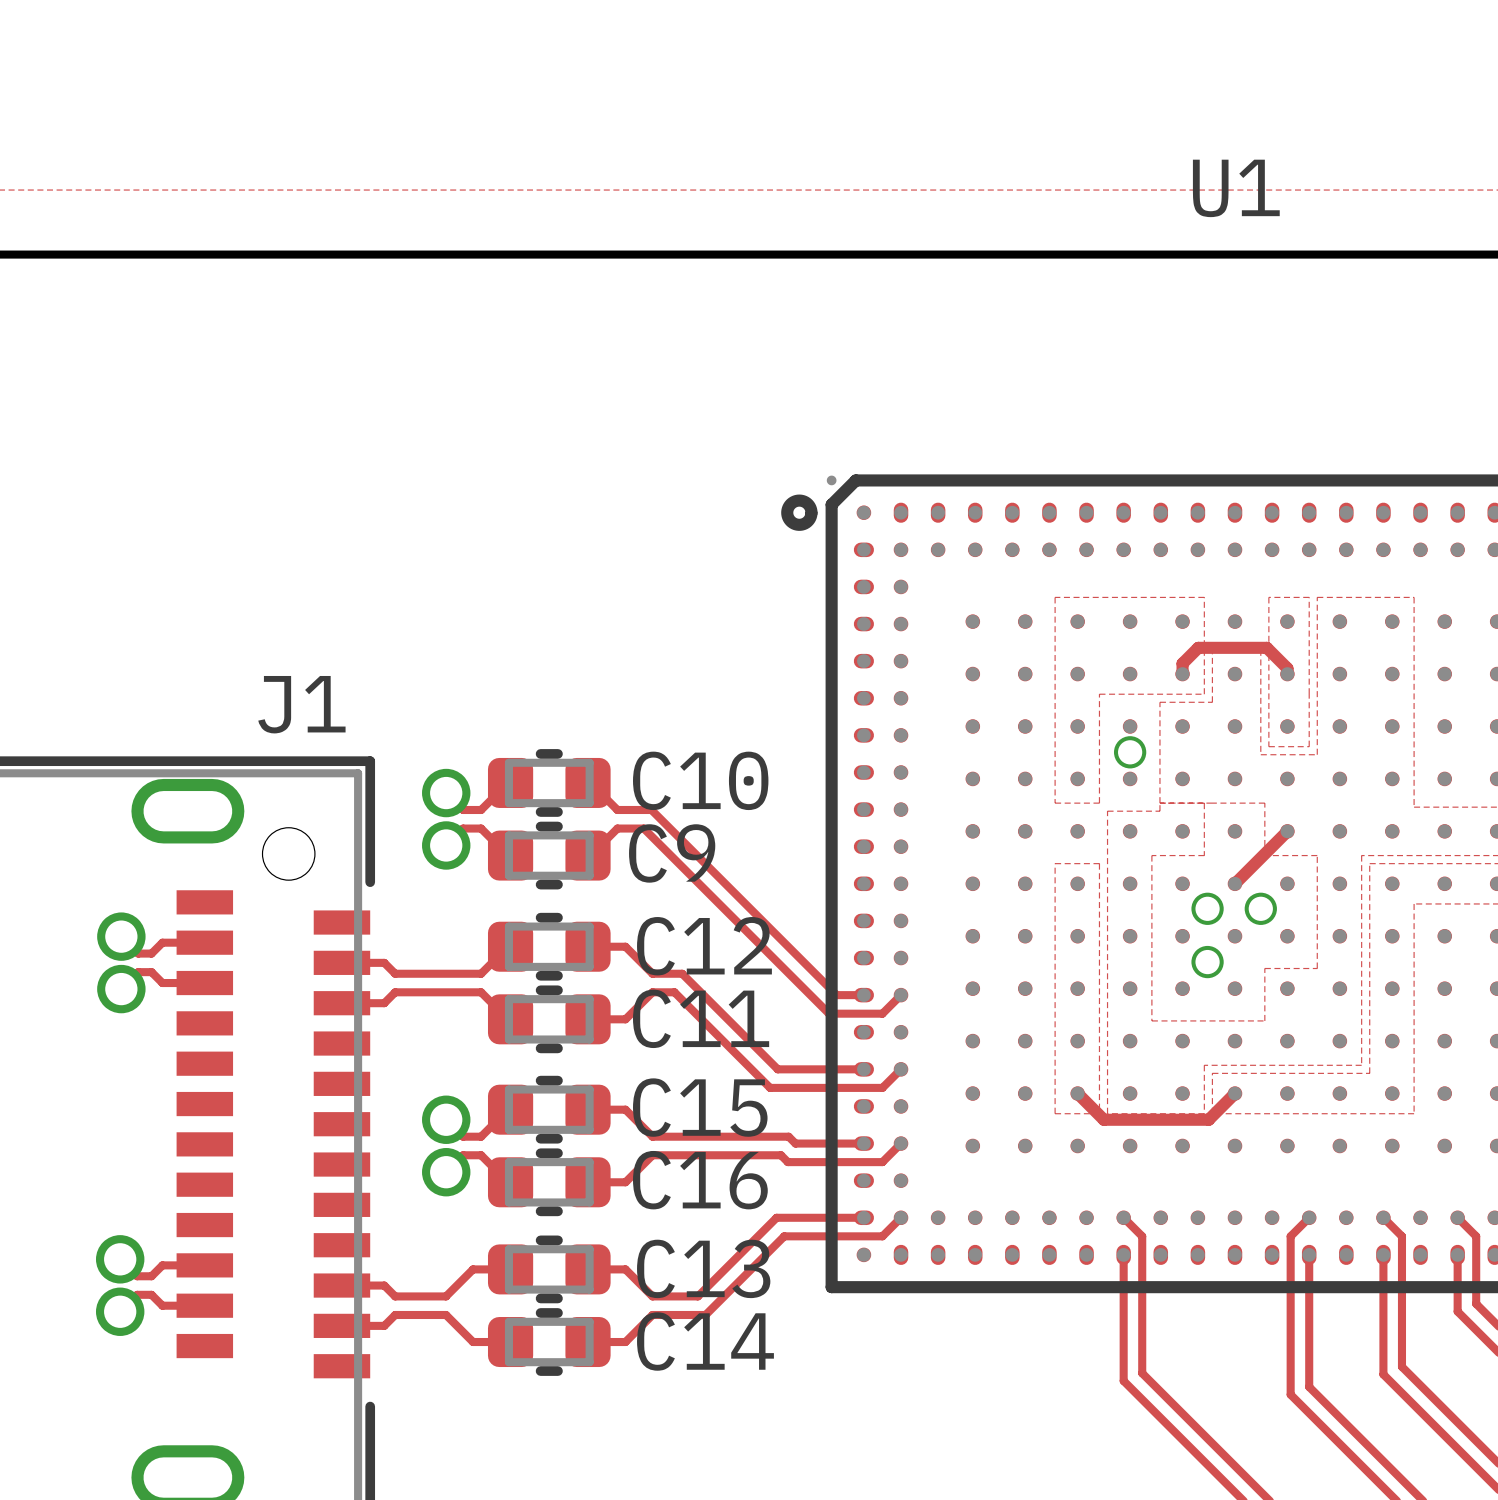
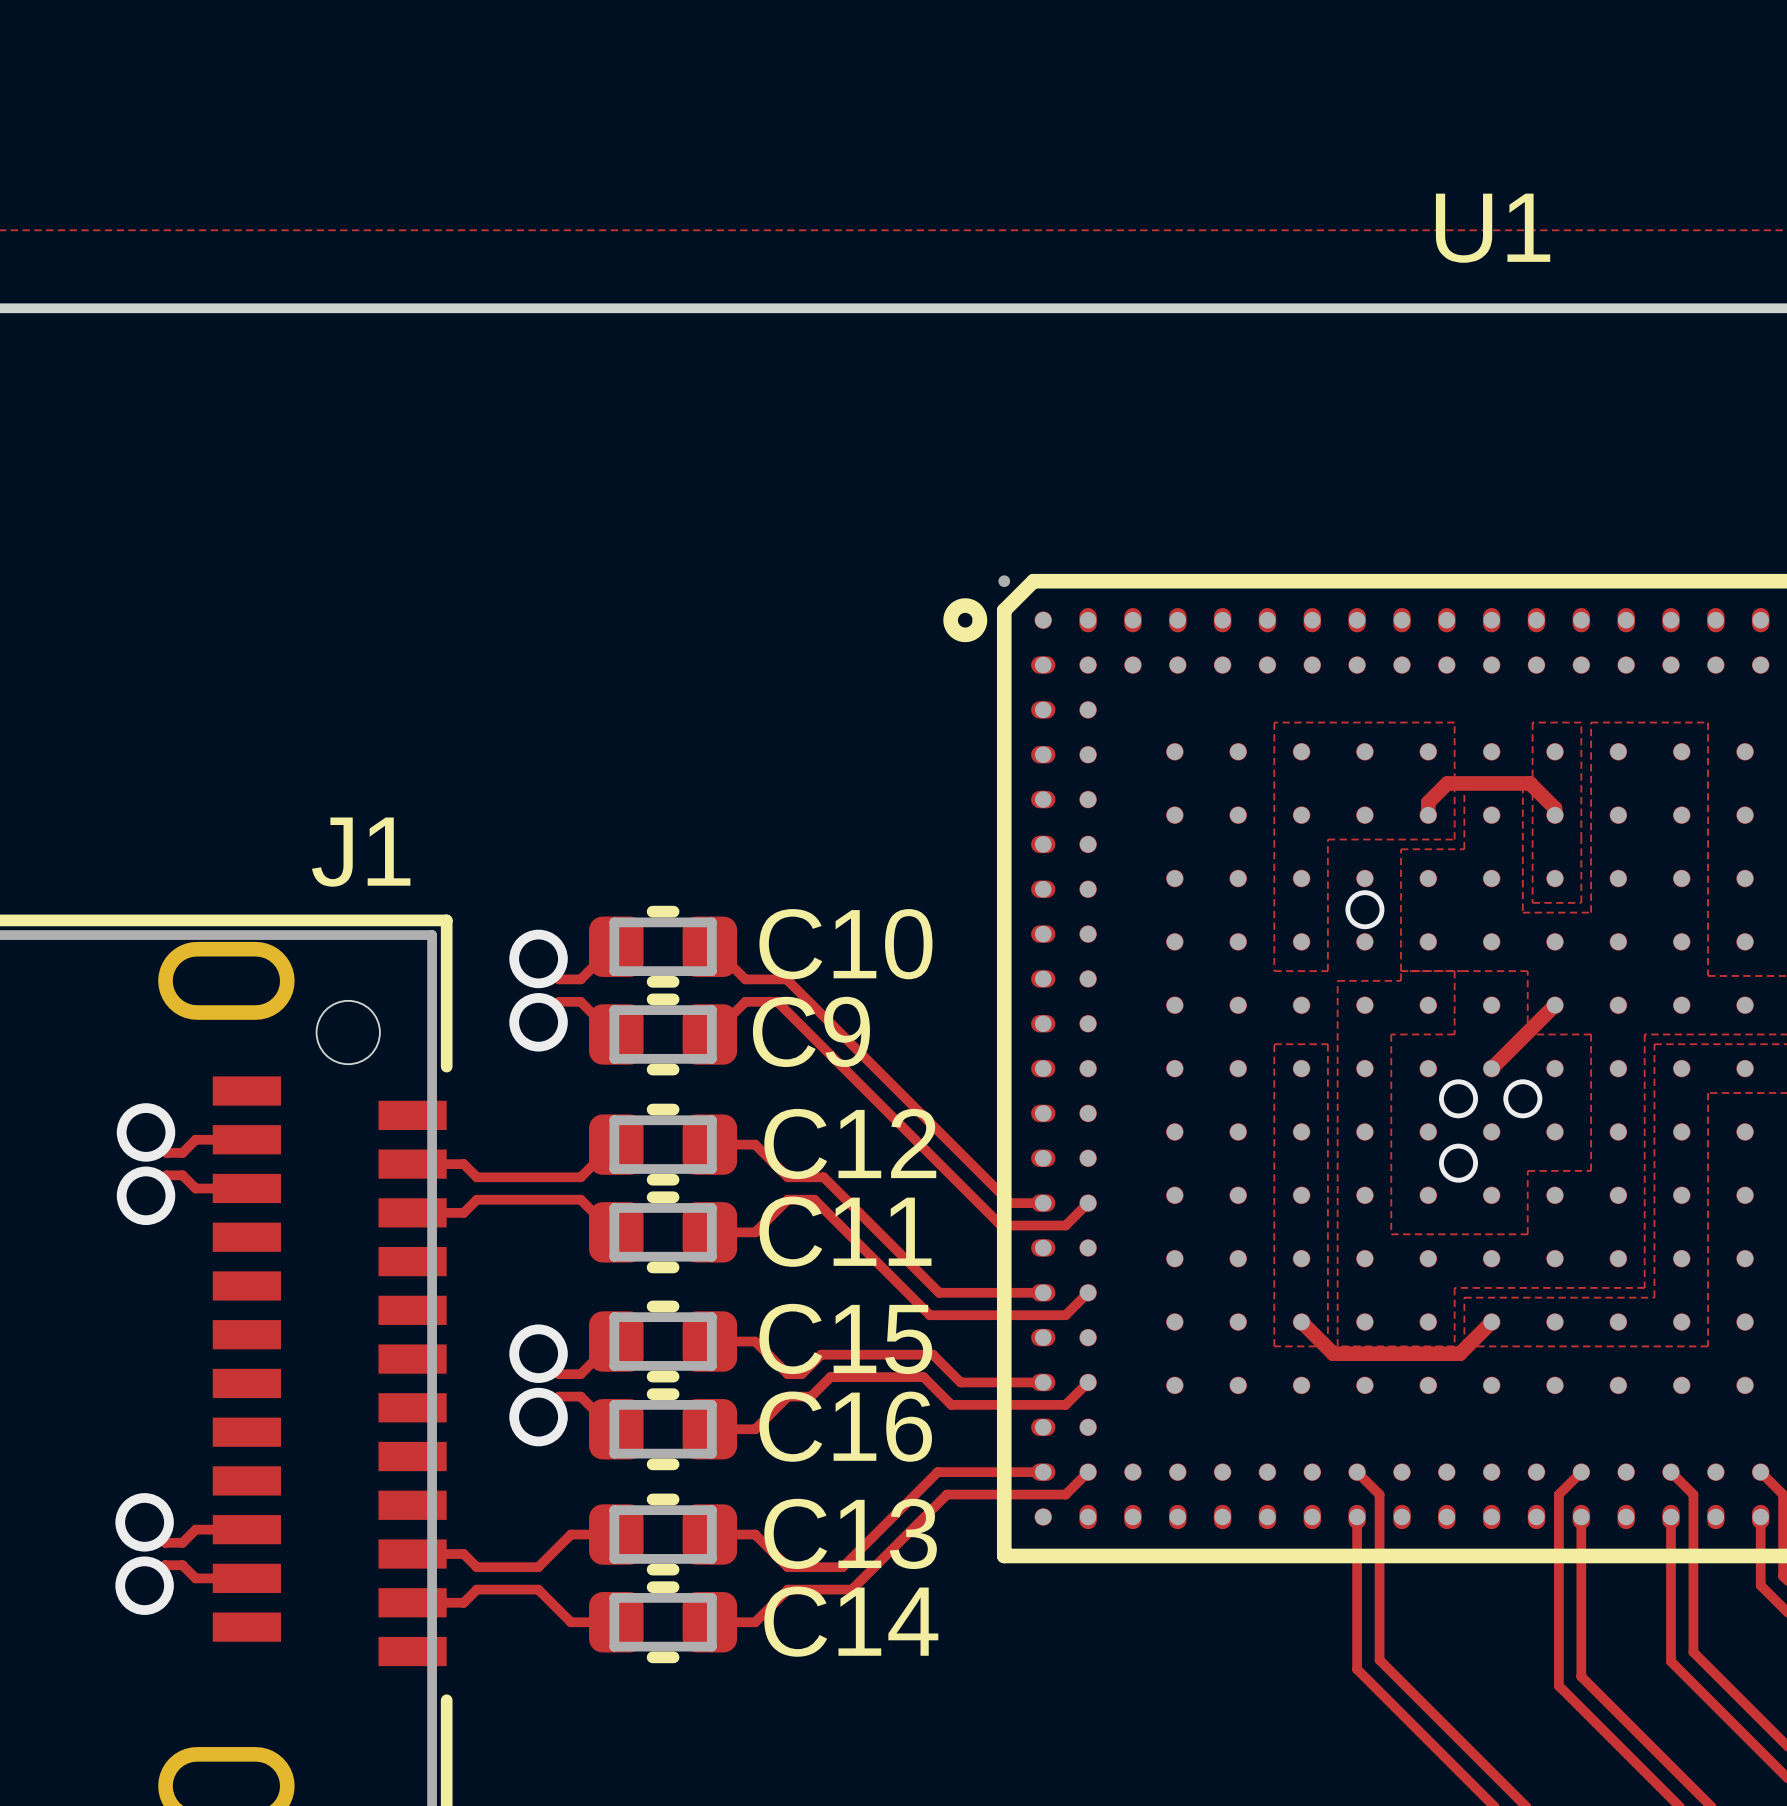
track: (664, 1136) (788, 1136) -> (801, 1374) (821, 1354) (932, 1354) (952, 1374)
track: (671, 1155) (781, 1155) -> (811, 1396) (830, 1377) (923, 1377) (943, 1396)

